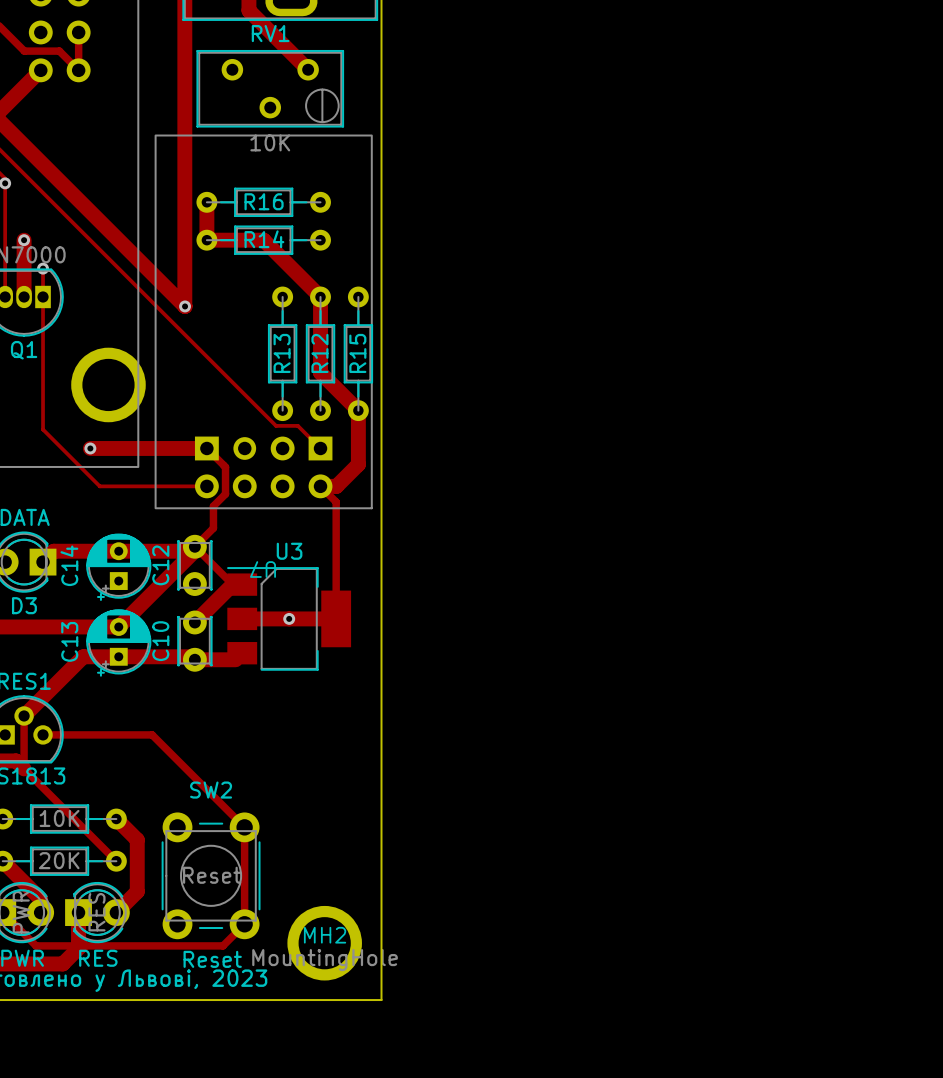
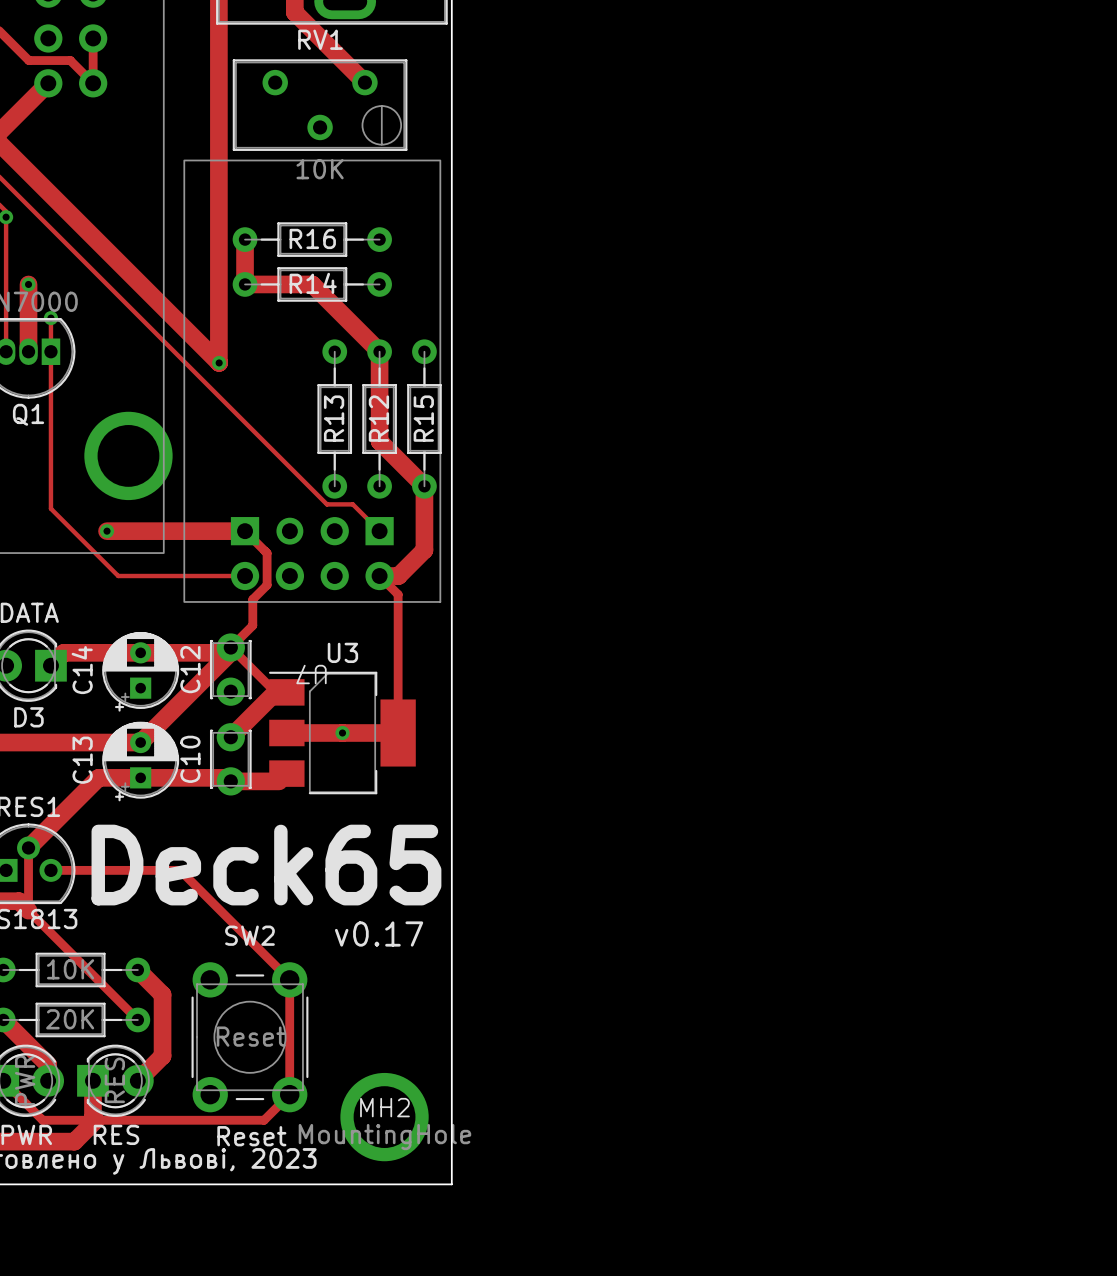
text: none -> Deck65 (266, 865)
text: none -> v0.17 (379, 934)

